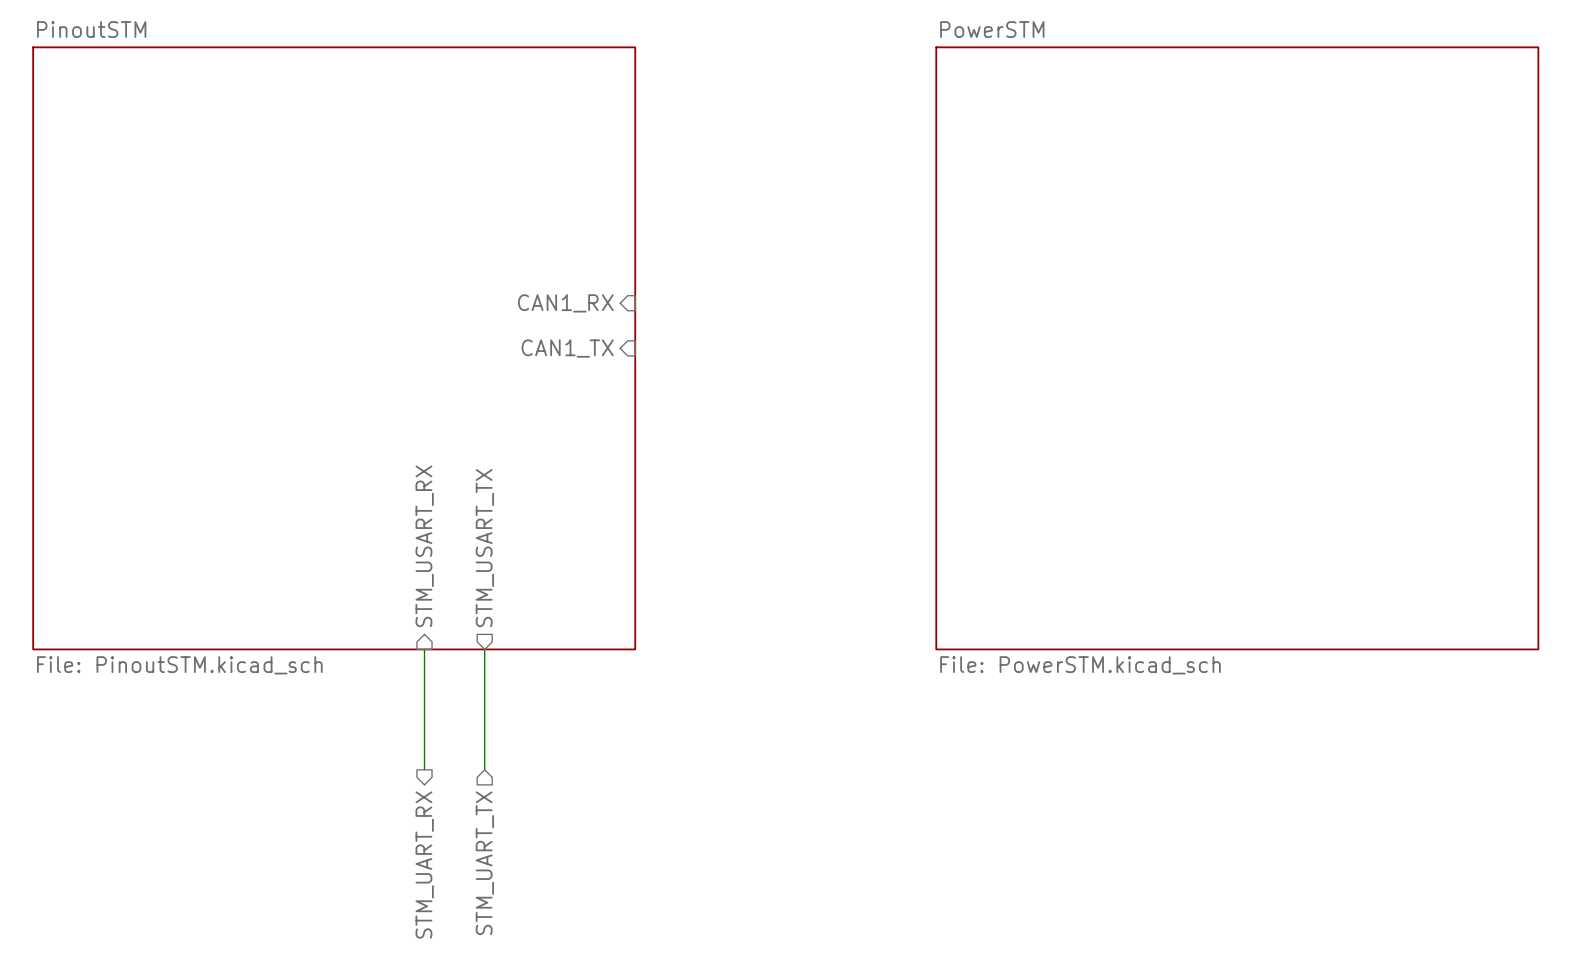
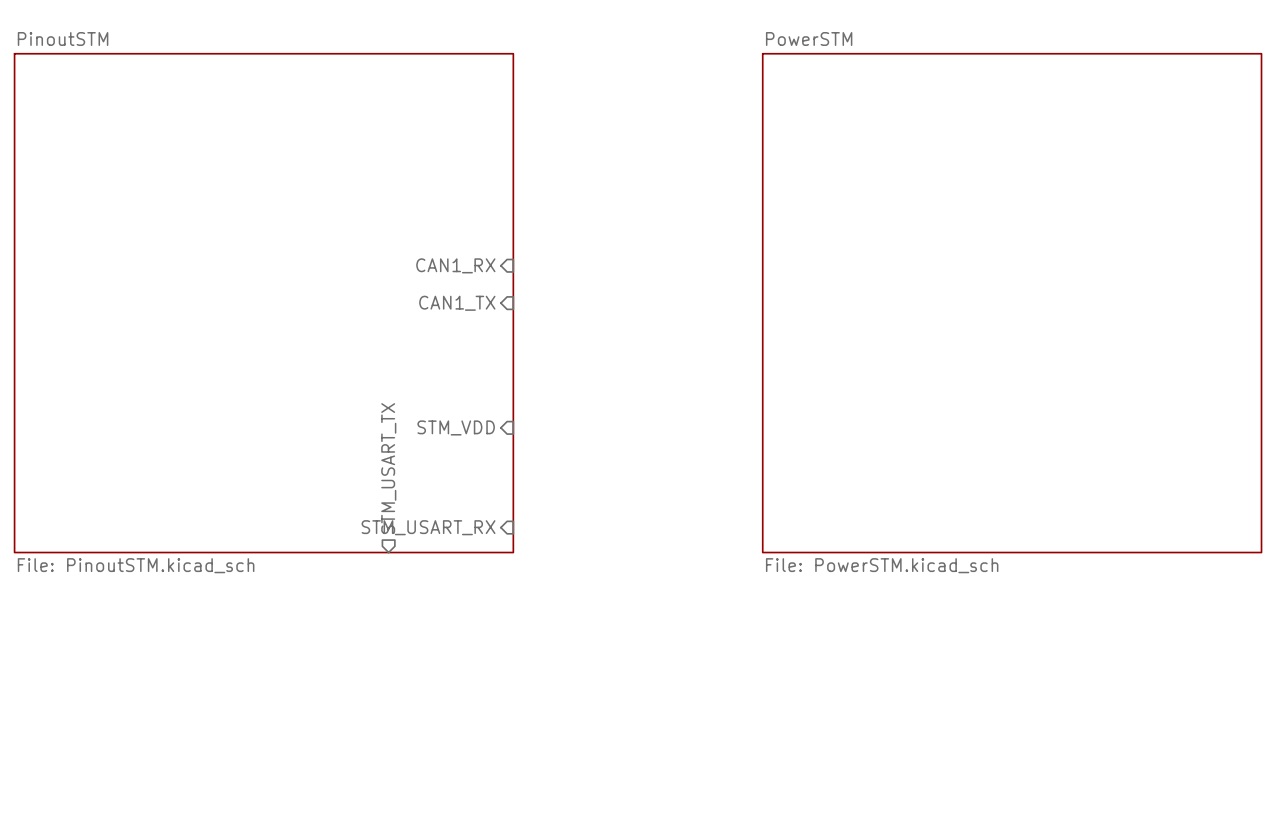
sheet pin: none -> STM_VDD (456, 427)
sheet pin rotation: 0° (424, 546) -> 90° counterclockwise (428, 527)
wire: (424, 649) (424, 769) -> none
wire: (484, 649) (484, 769) -> none
hierarchical label: STM_UART_TX (484, 863) -> none
hierarchical label: STM_UART_RX (424, 865) -> none

